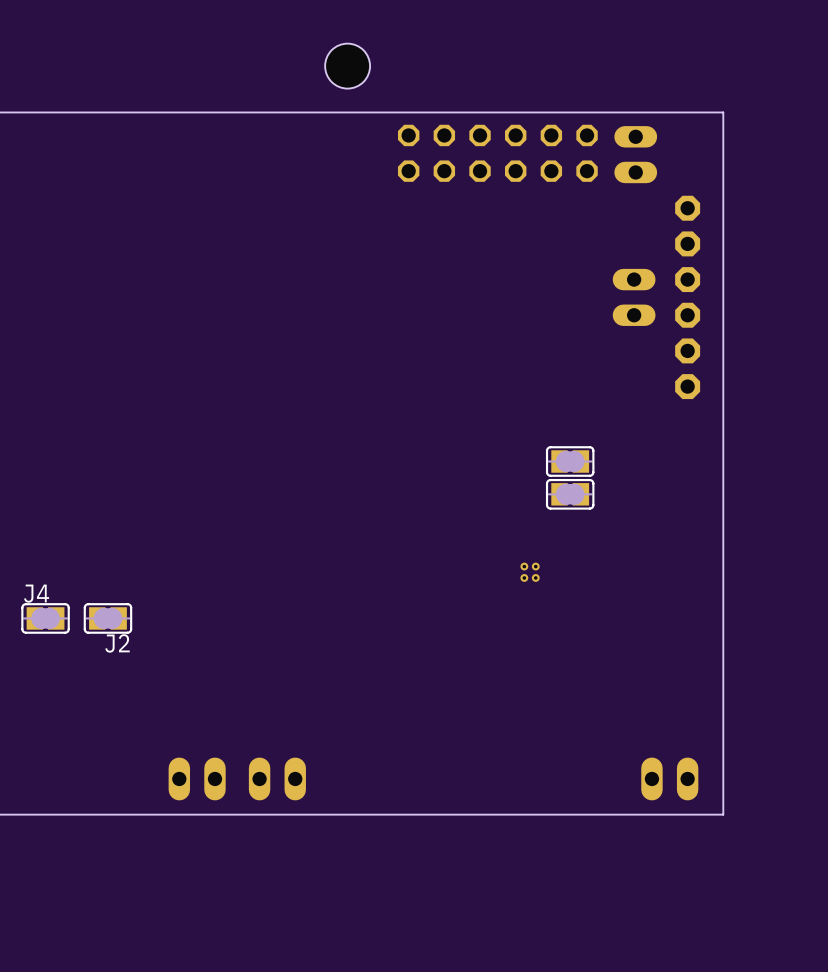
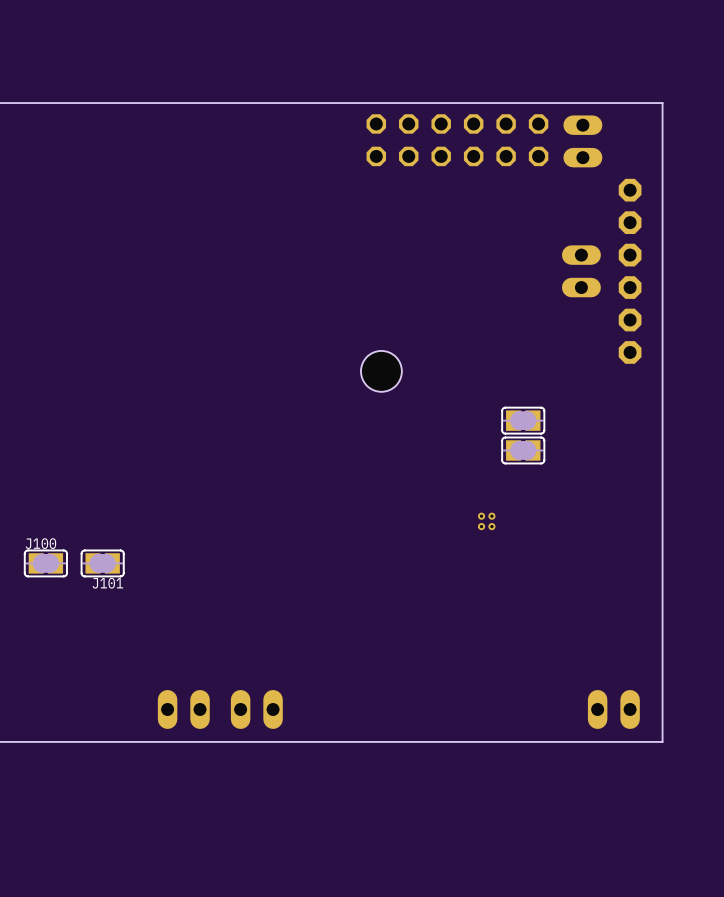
hole position: (347, 66) -> (381, 371)
J4 name: J4 (36, 593) -> J100 (40, 543)
J2 name: J2 (117, 643) -> J101 (107, 583)

